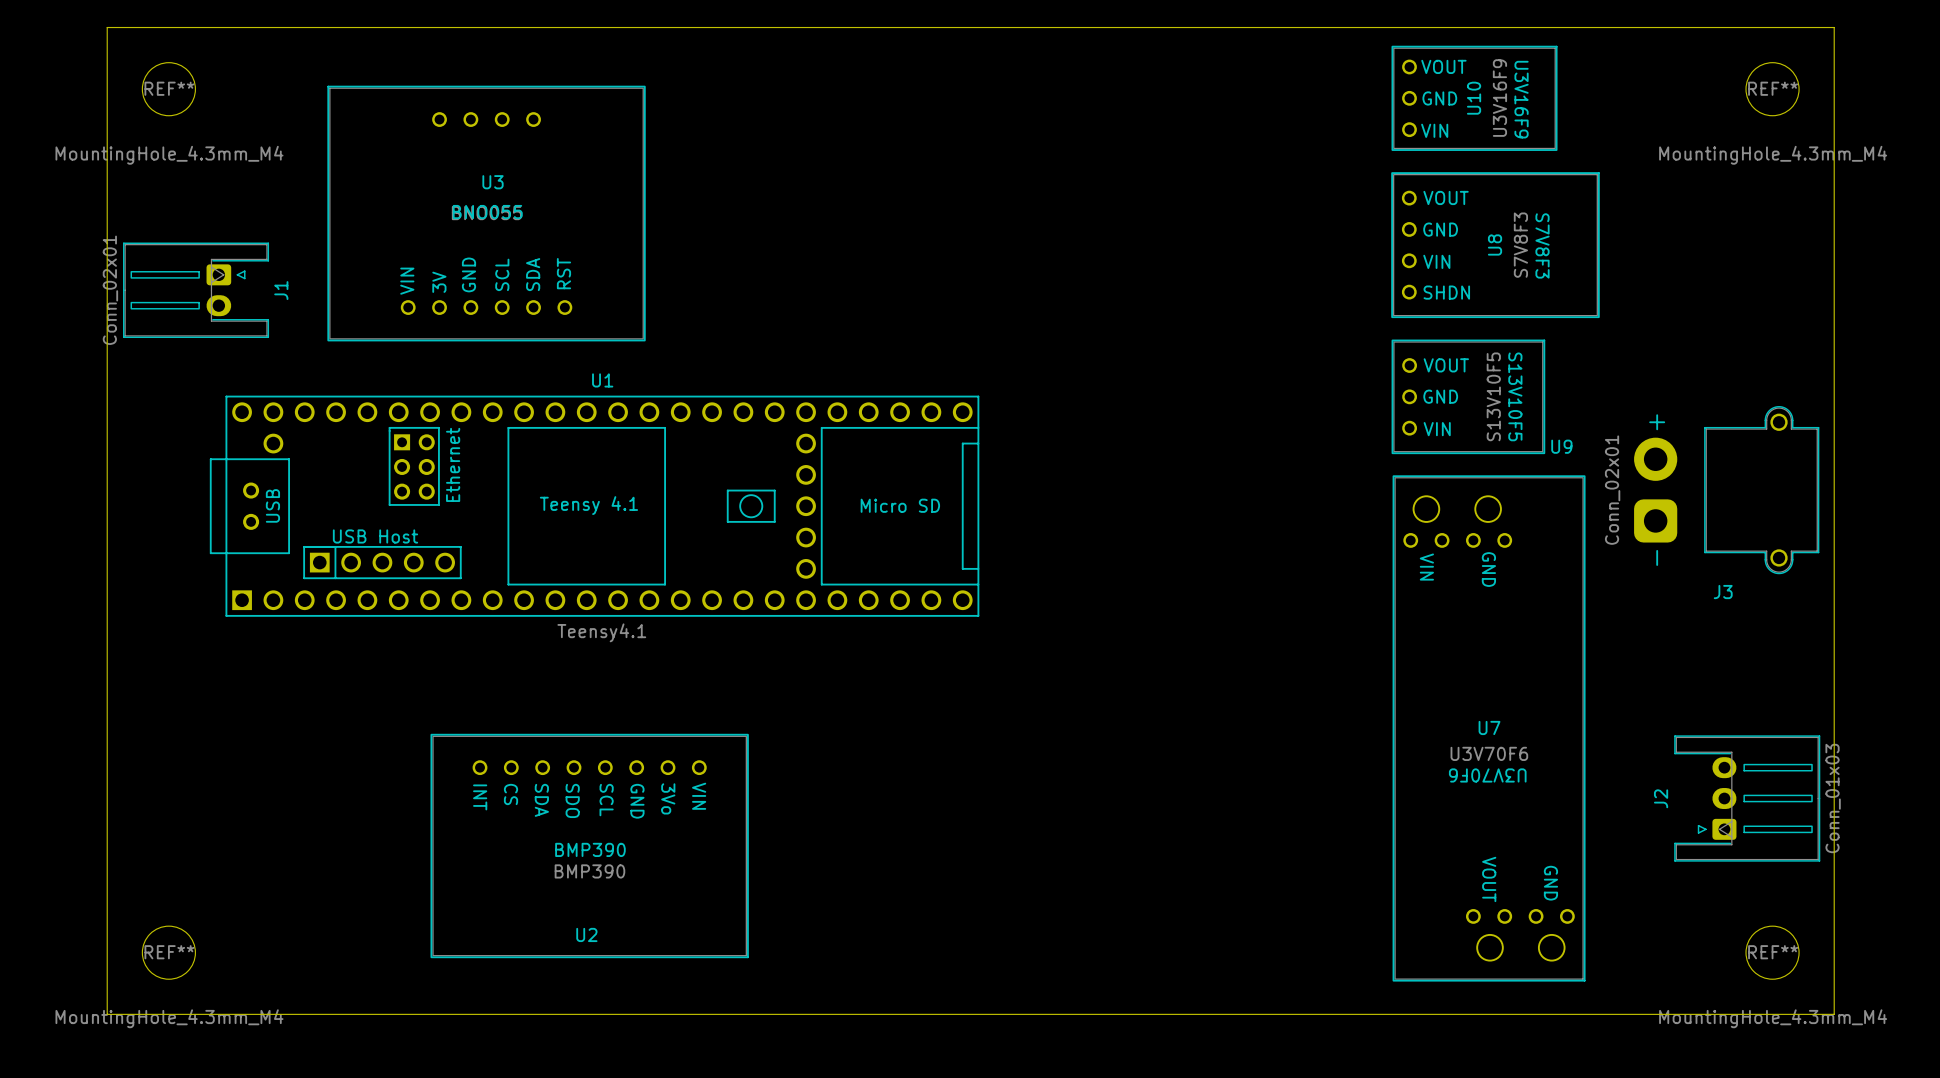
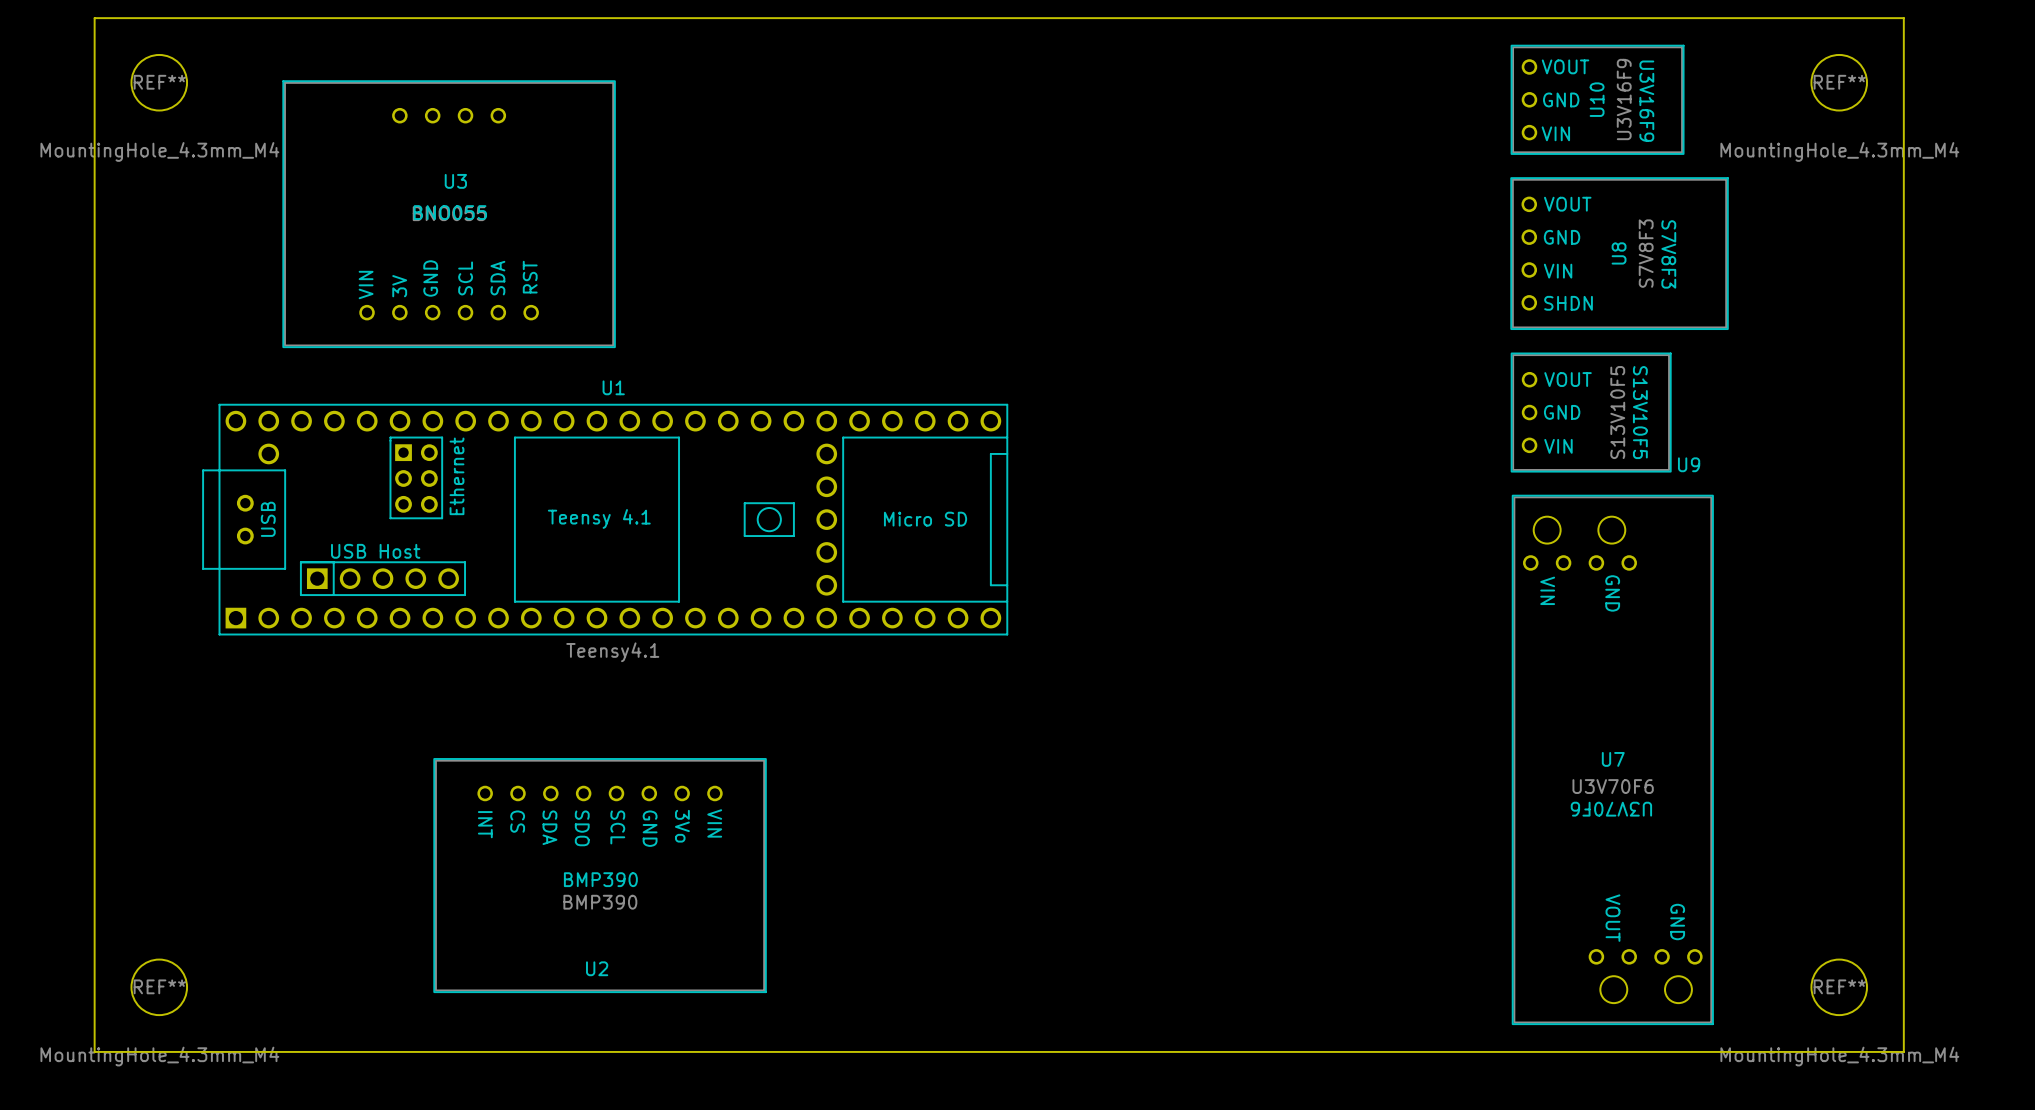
U10 position: (1474, 98) -> (1597, 99)
U3 position: (486, 213) -> (449, 214)
U8 position: (1495, 245) -> (1619, 253)
J1: Conn_02x01 (196, 290) -> none
U9 position: (1468, 396) -> (1591, 412)
J3: Conn_02x01 (1726, 490) -> none
U7 position: (1489, 728) -> (1612, 759)
J2: Conn_01x03 (1747, 798) -> none

